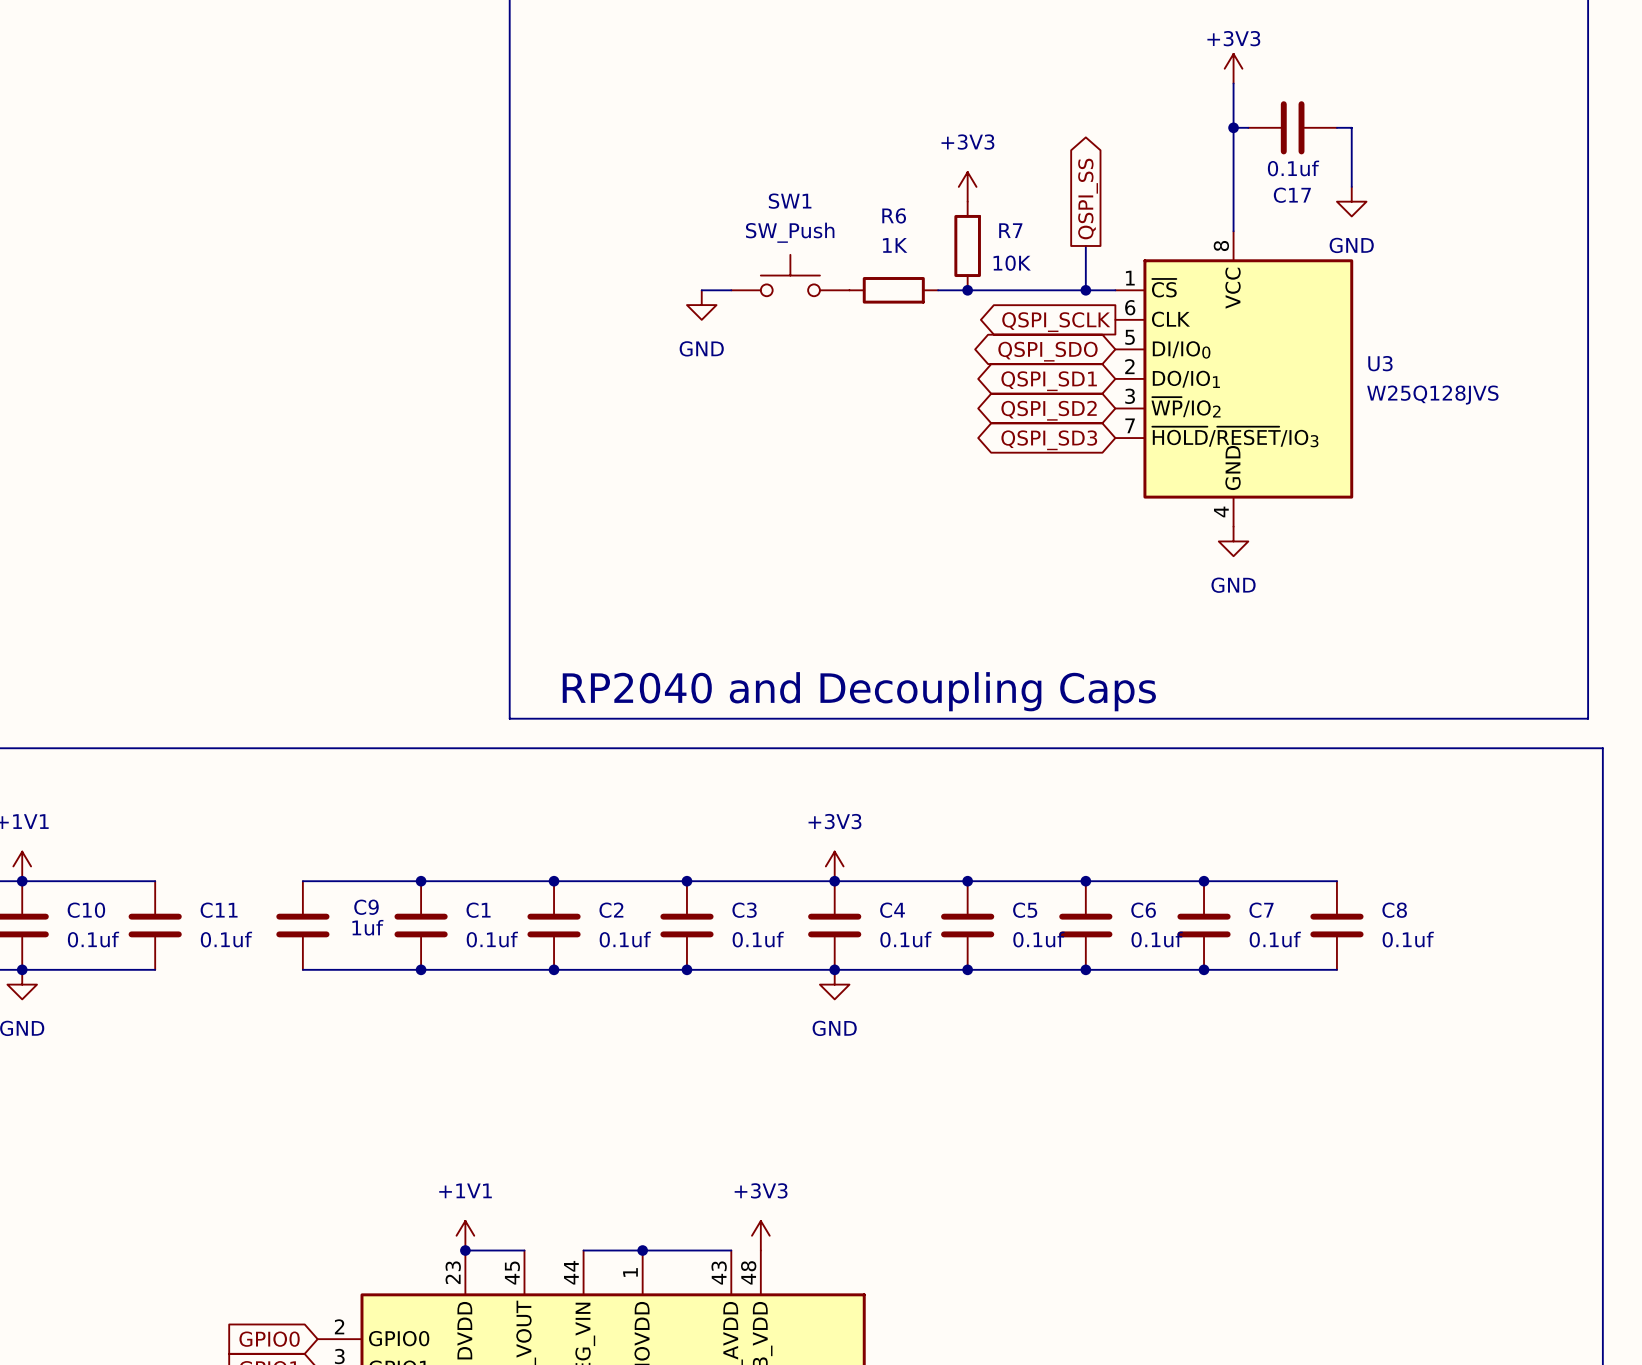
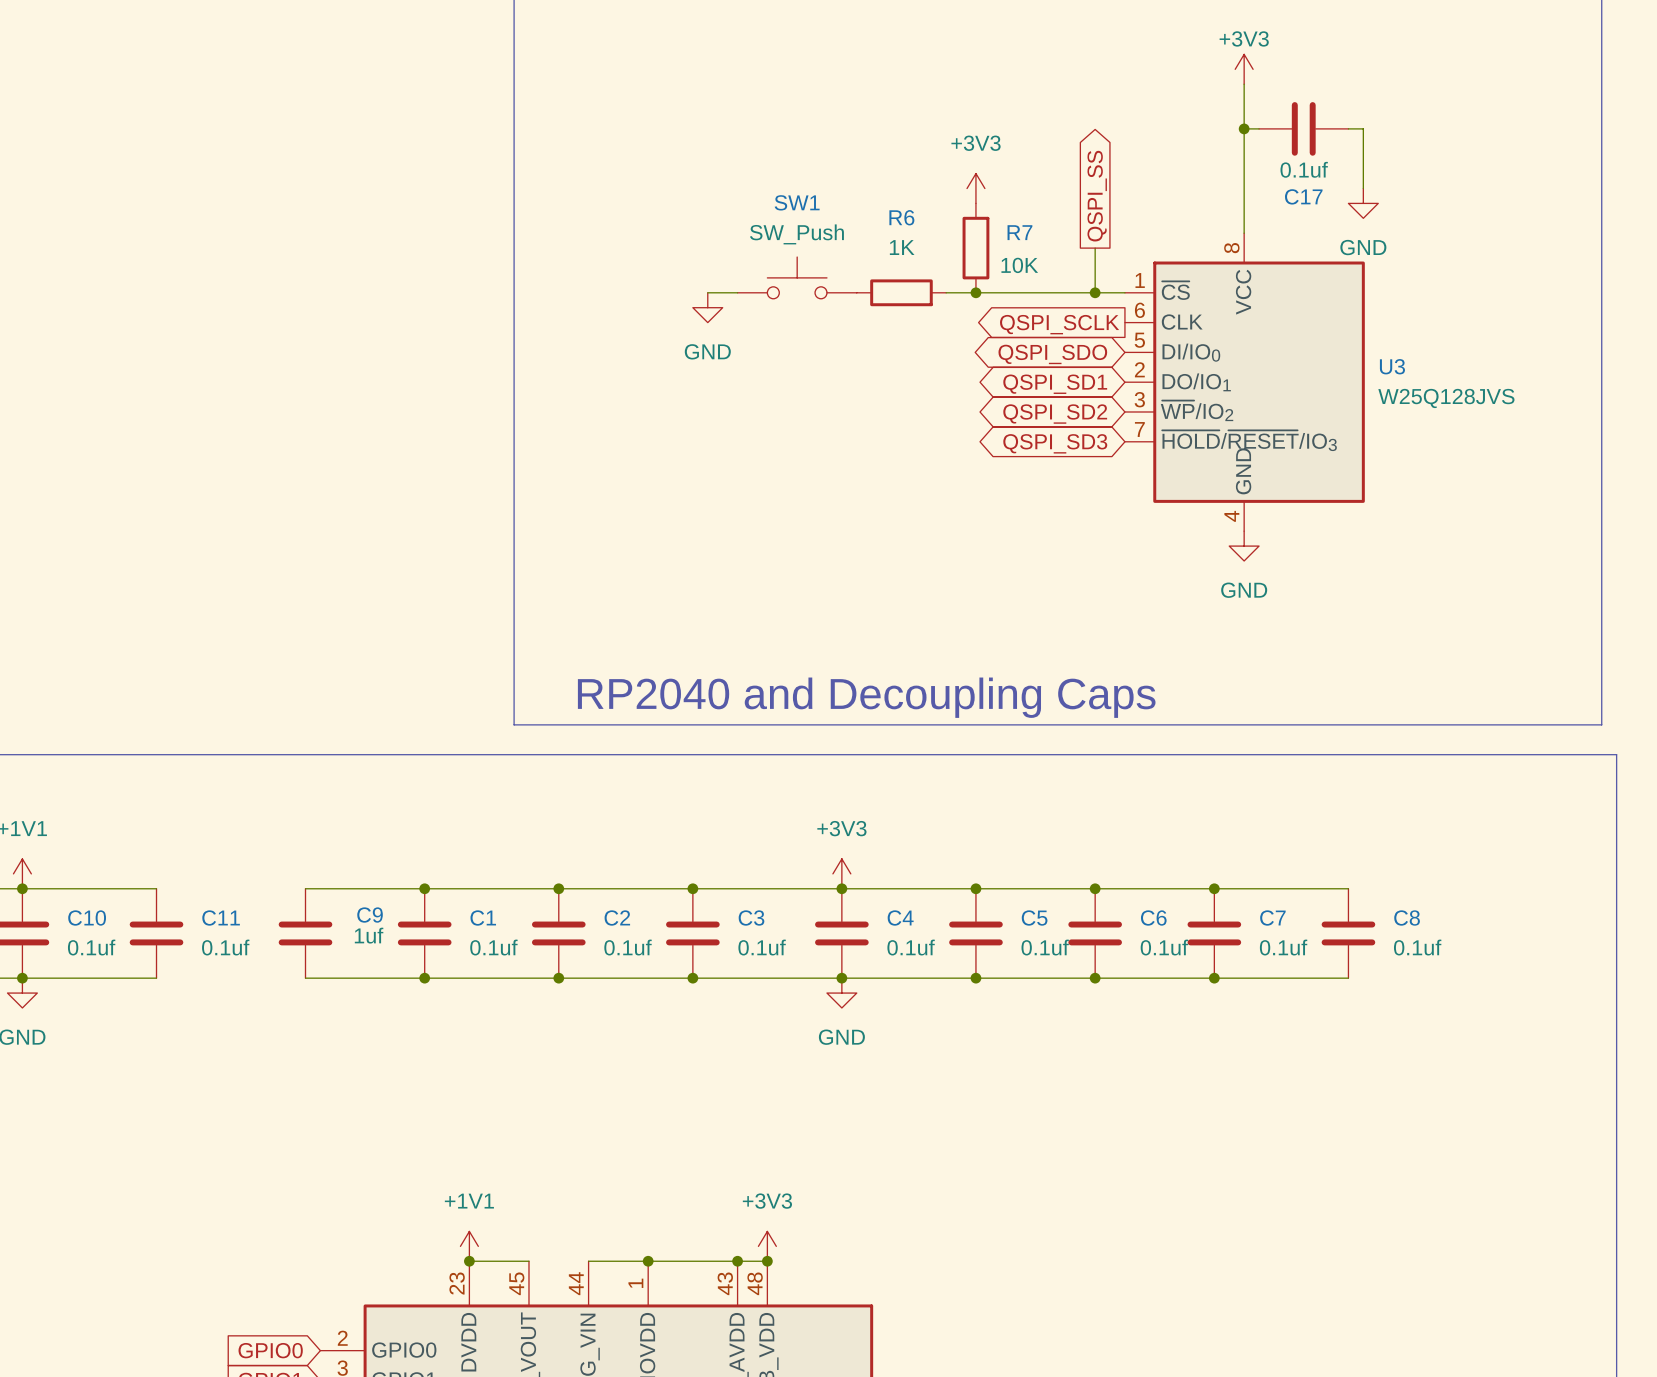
wire: none -> (737, 1261) (767, 1261)
junction: none -> (737, 1261)
junction: none -> (767, 1261)

